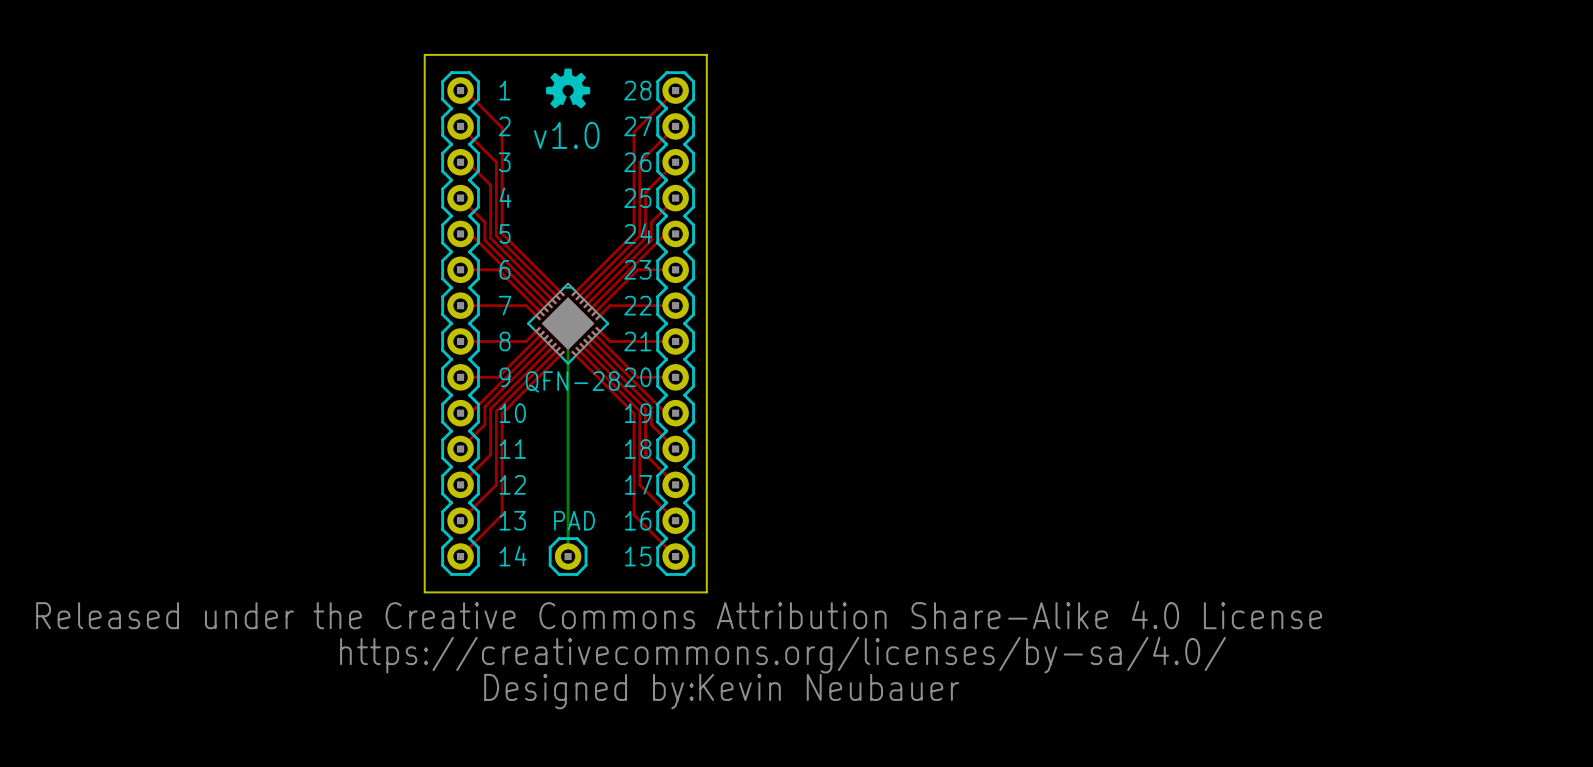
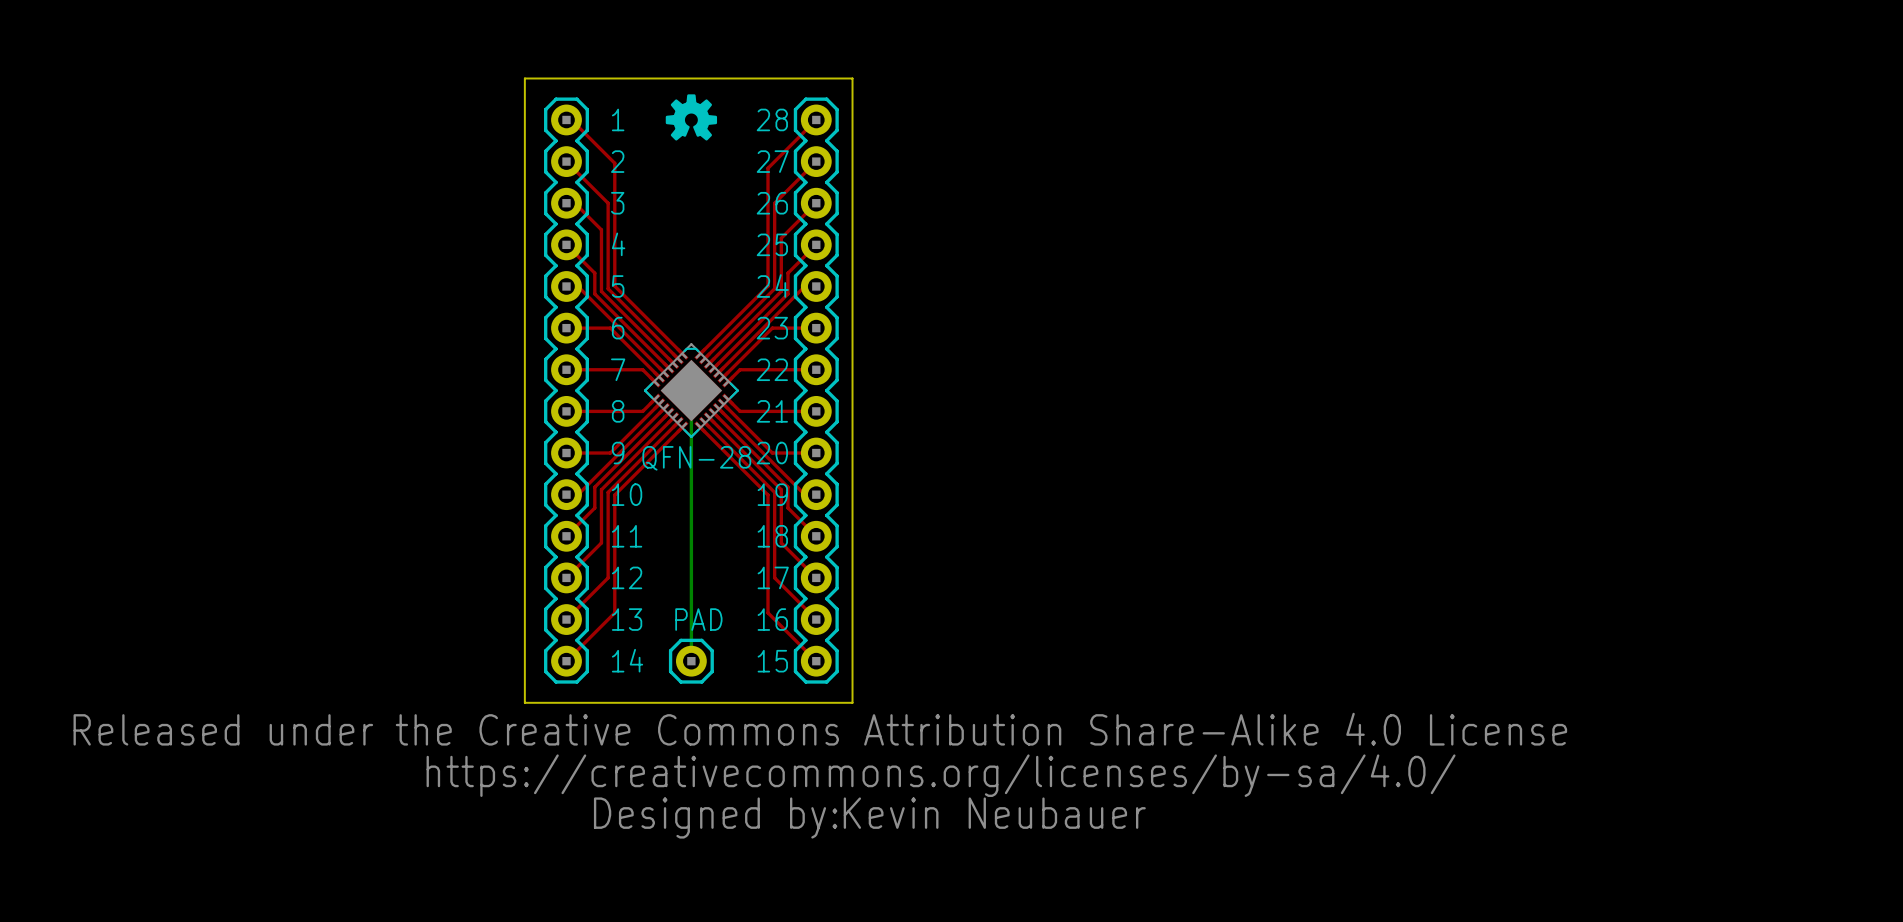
text: v1.0 (566, 135) -> none

